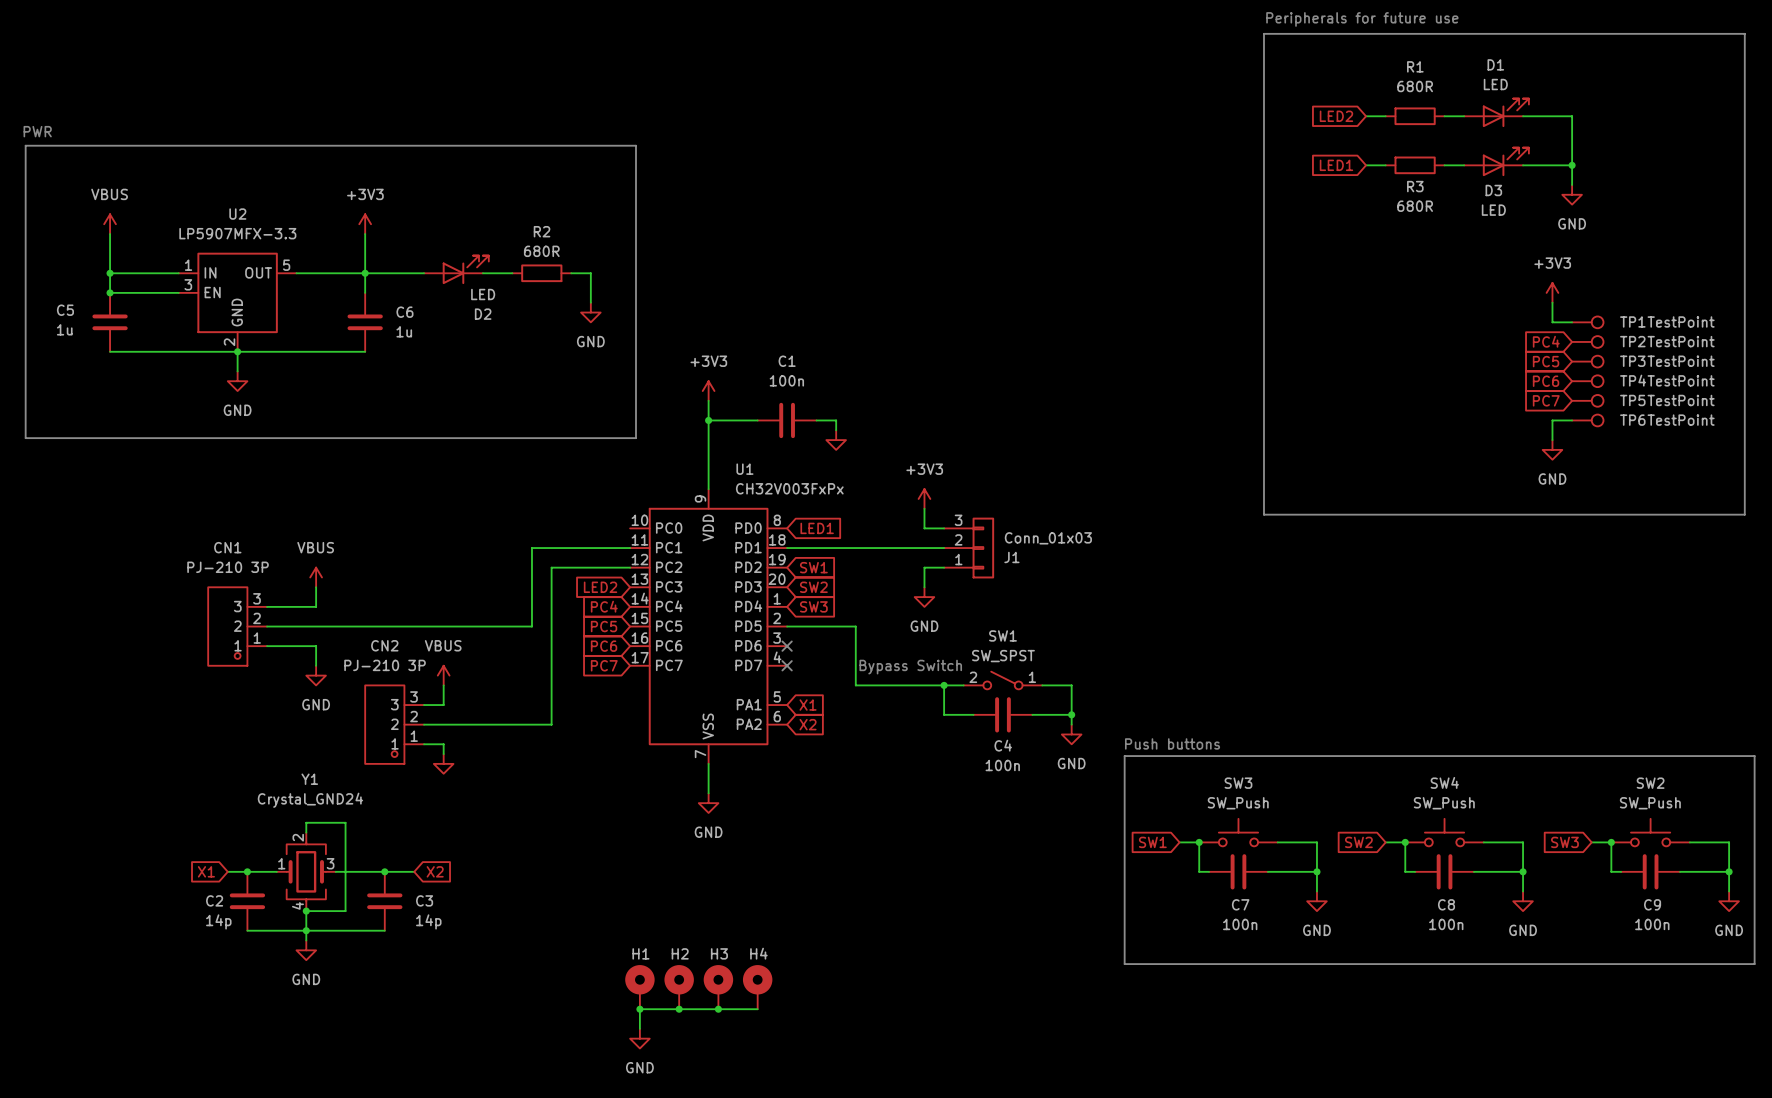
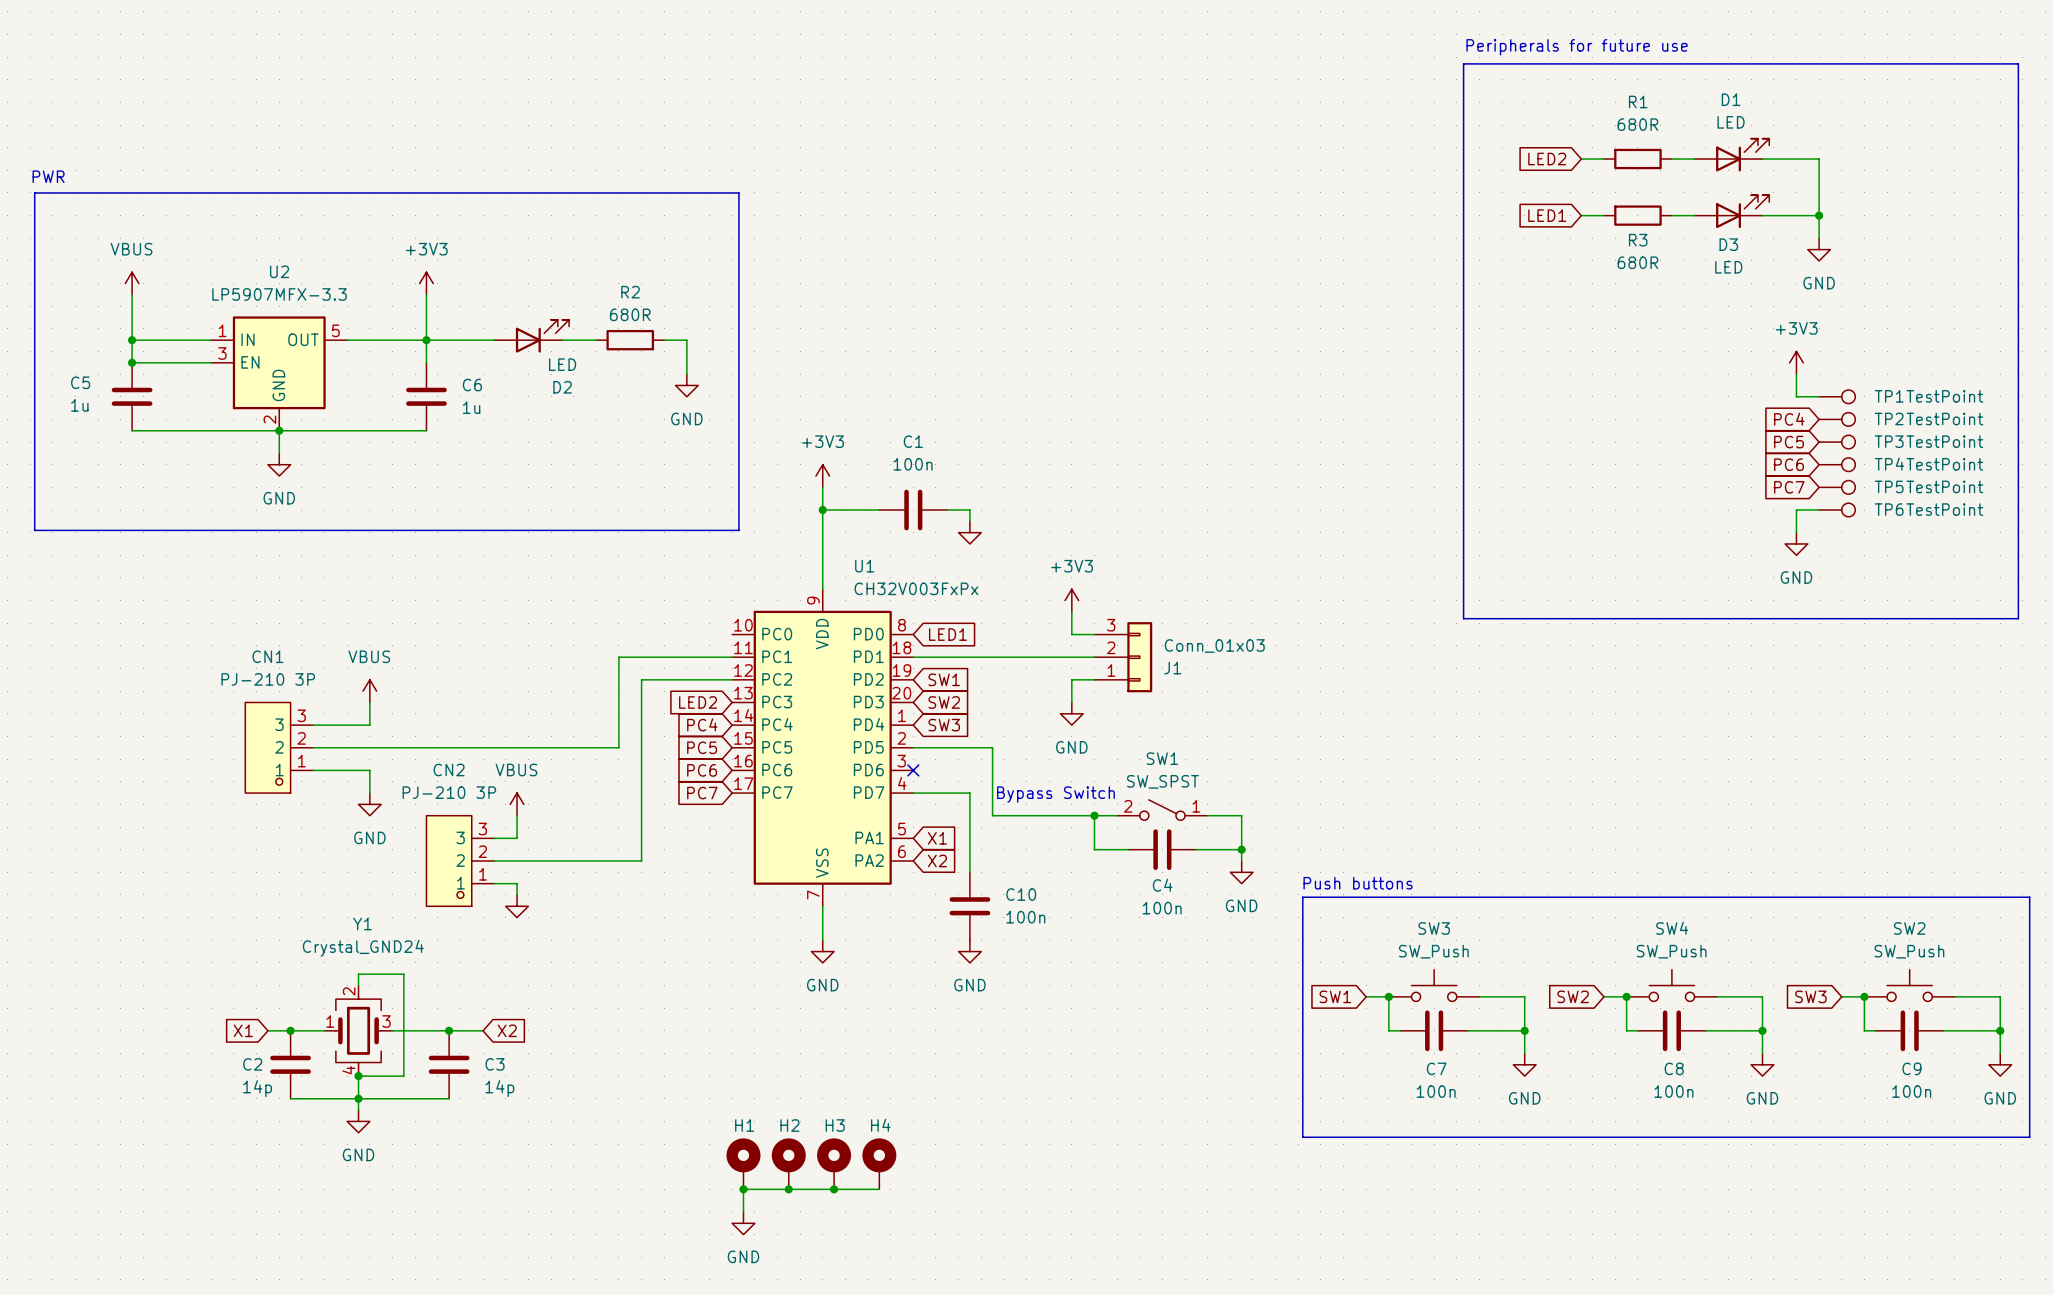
wire: none -> (913, 793) (969, 793) (969, 872)
no-connect mark: (787, 665) -> none
C10: none -> 100n (969, 906)
power symbol: none -> GND (969, 951)

